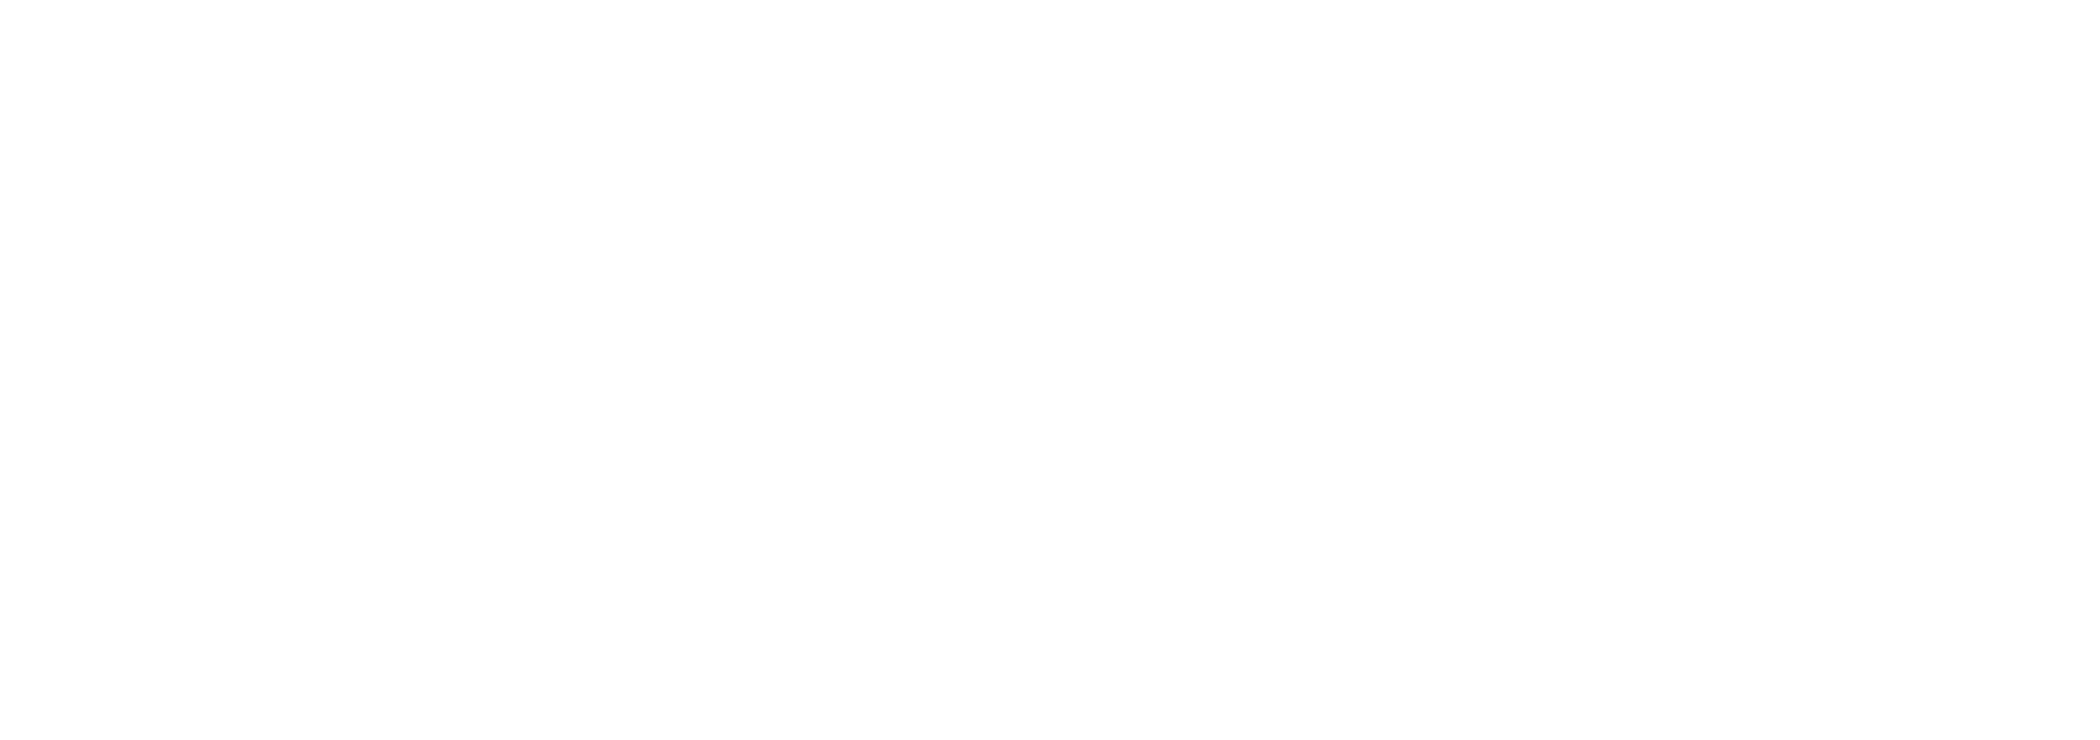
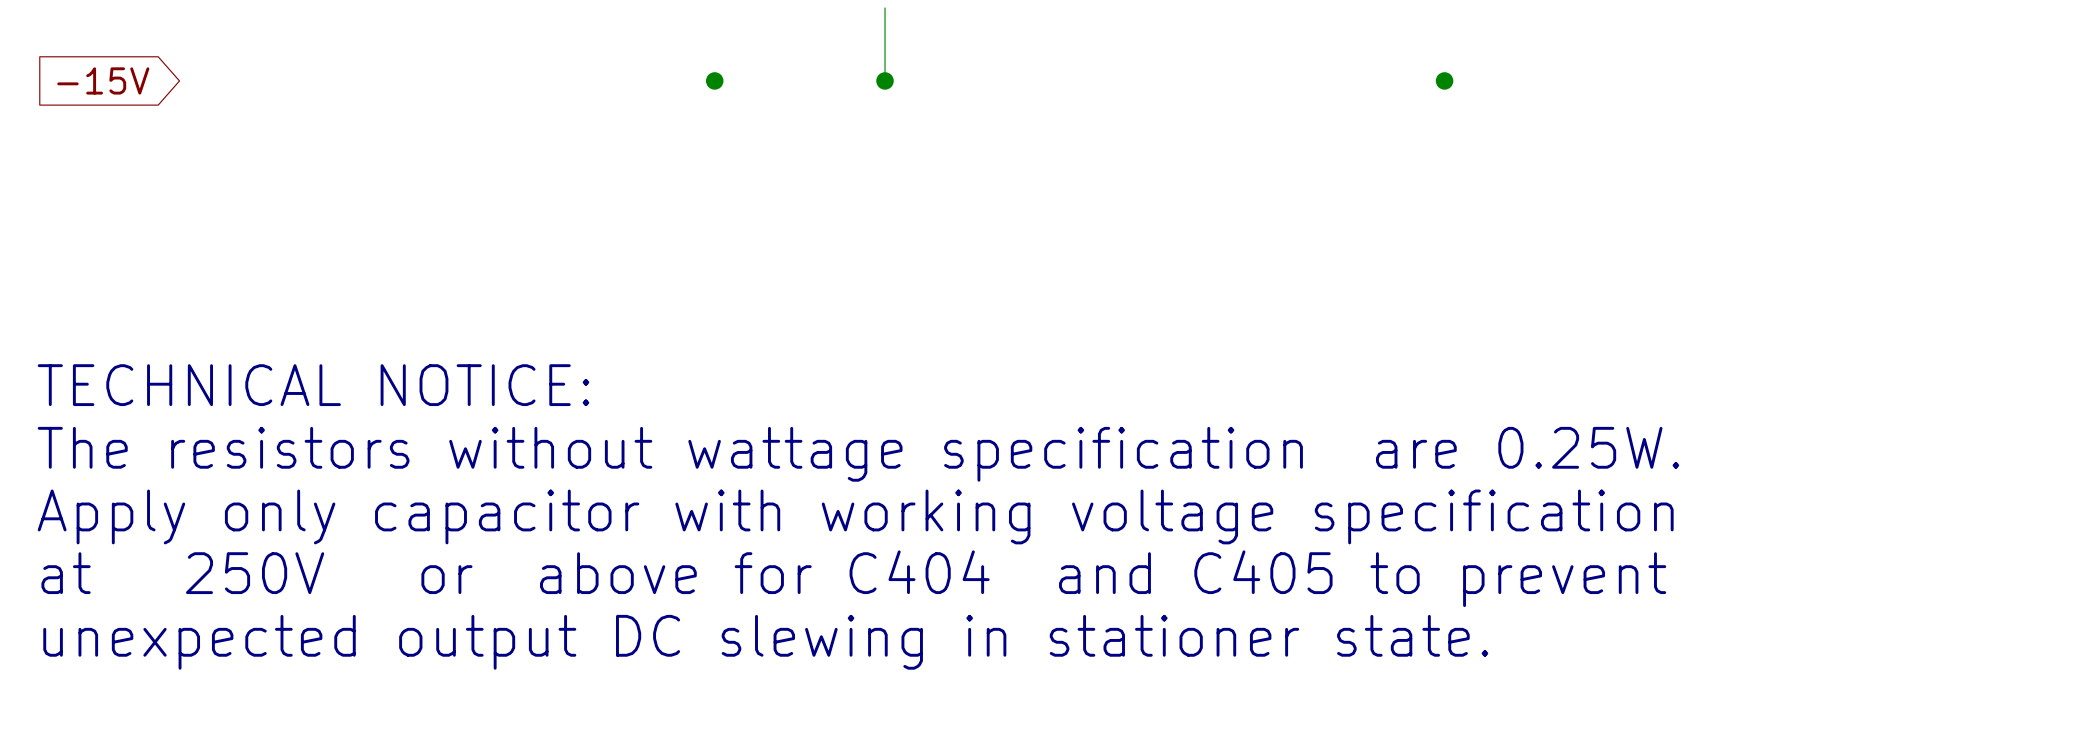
wire: none -> (885, 7) (885, 80)
global label: none -> -15V (103, 80)
junction: none -> (714, 80)
junction: none -> (885, 80)
junction: none -> (1444, 80)
text: none -> TECHNICAL NOTICE: (313, 385)
text: none -> The resistors without wattage specification are 0.25W. (858, 454)
text: none -> Apply only capacitor with working voltage specification (855, 516)
text: none -> at 250V or above for C404 and C405 to prevent (853, 578)
text: none -> unexpected output DC slewing in stationer state. (765, 642)

